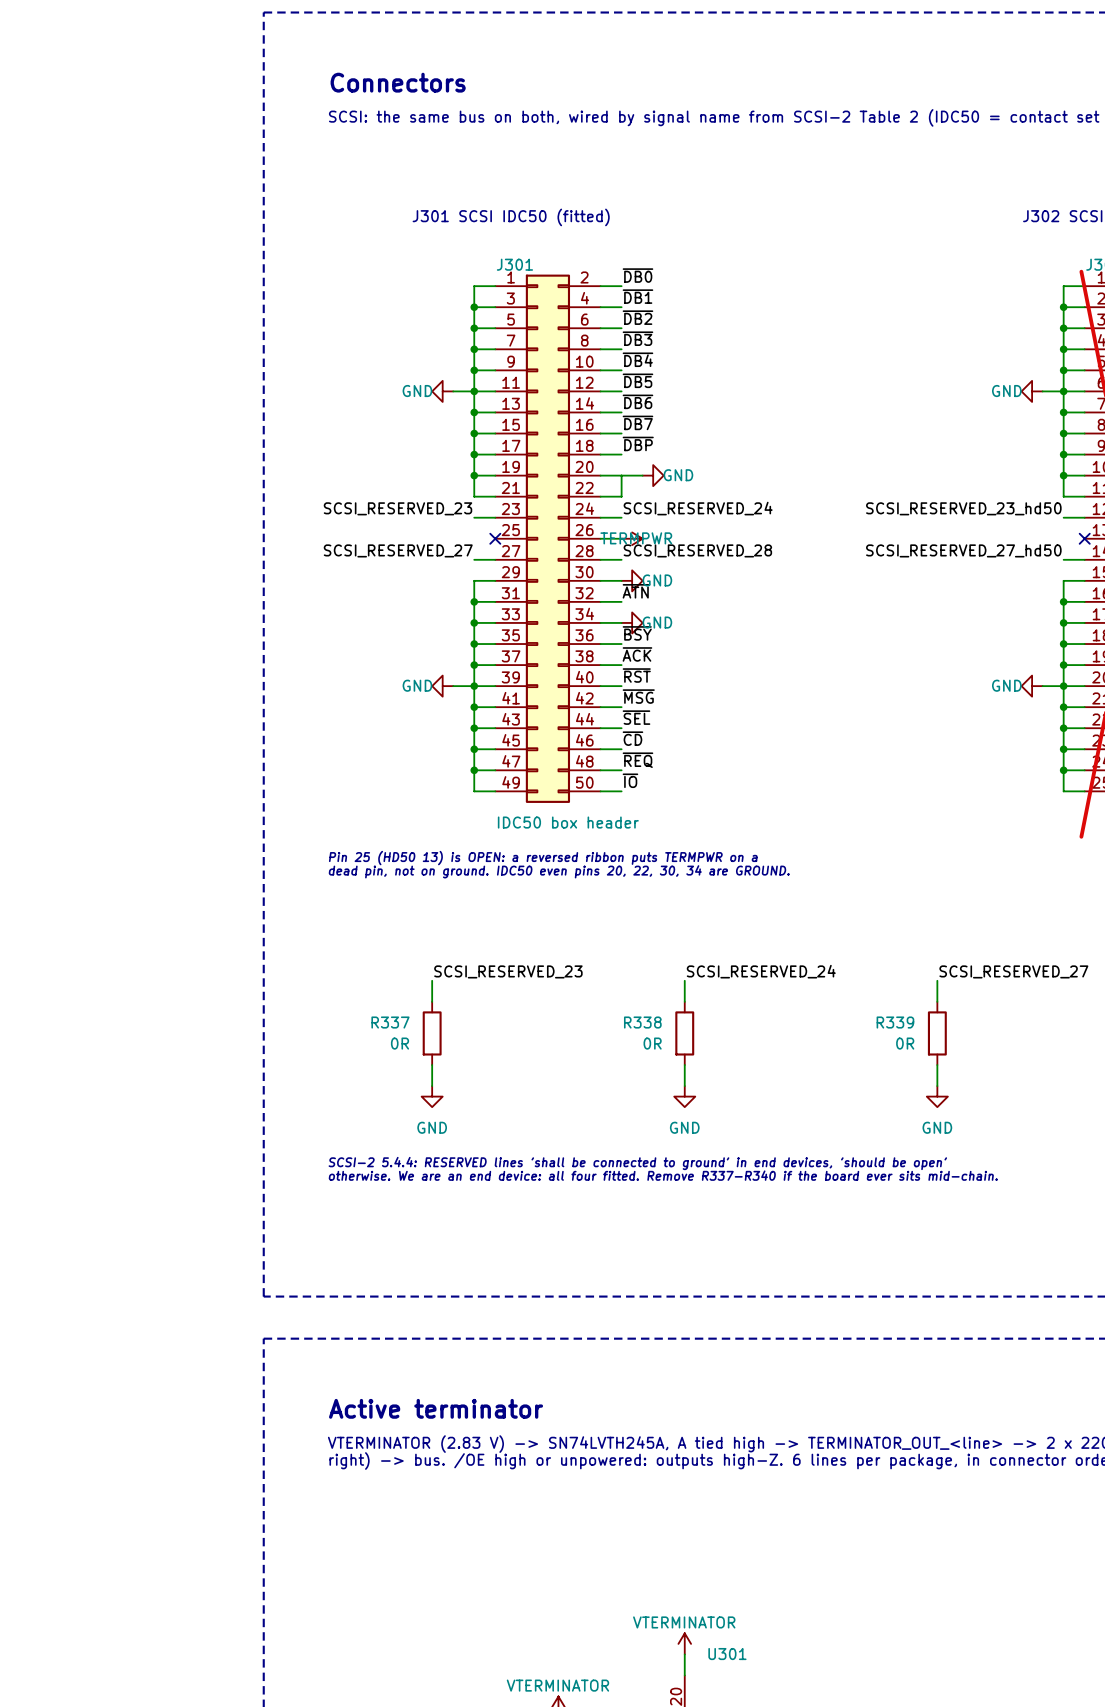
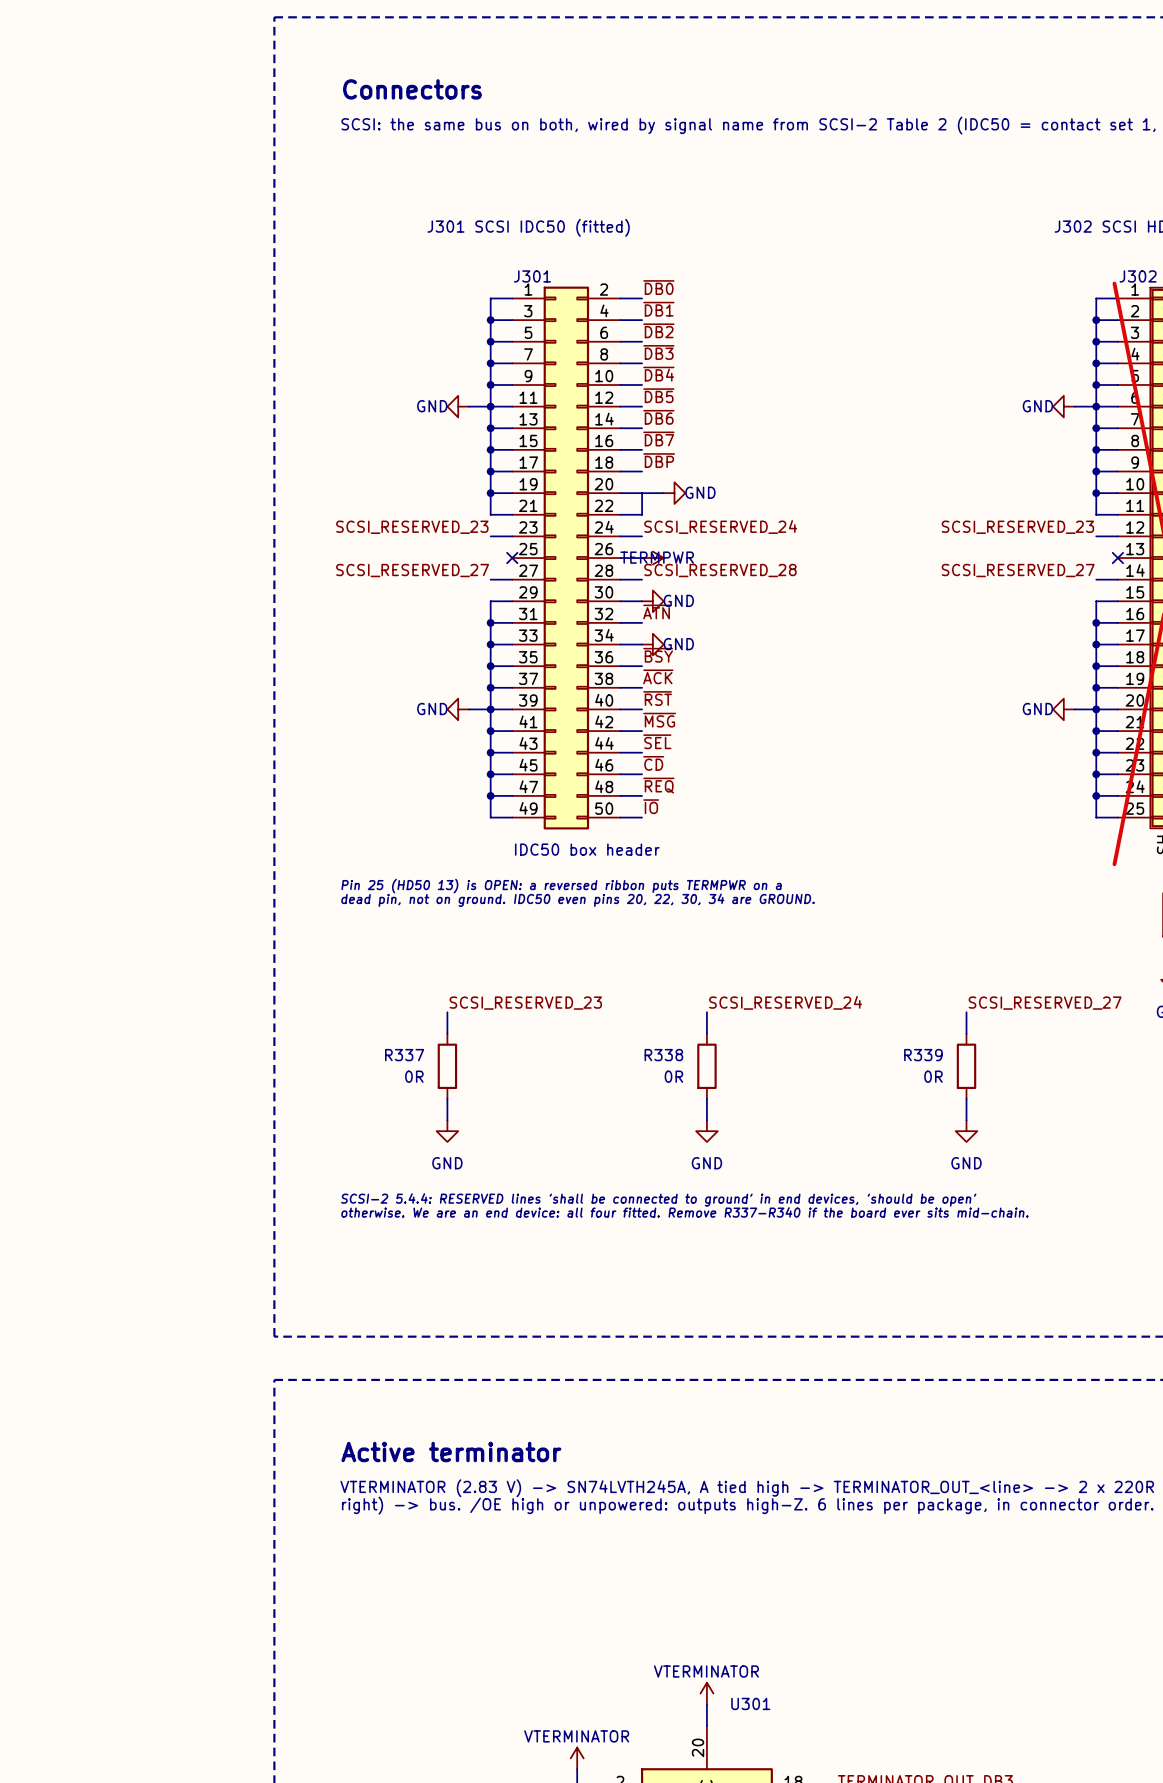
label: SCSI_RESERVED_23_hd50 (963, 508) -> SCSI_RESERVED_23 (1017, 527)
label: SCSI_RESERVED_27_hd50 (963, 550) -> SCSI_RESERVED_27 (1018, 570)

